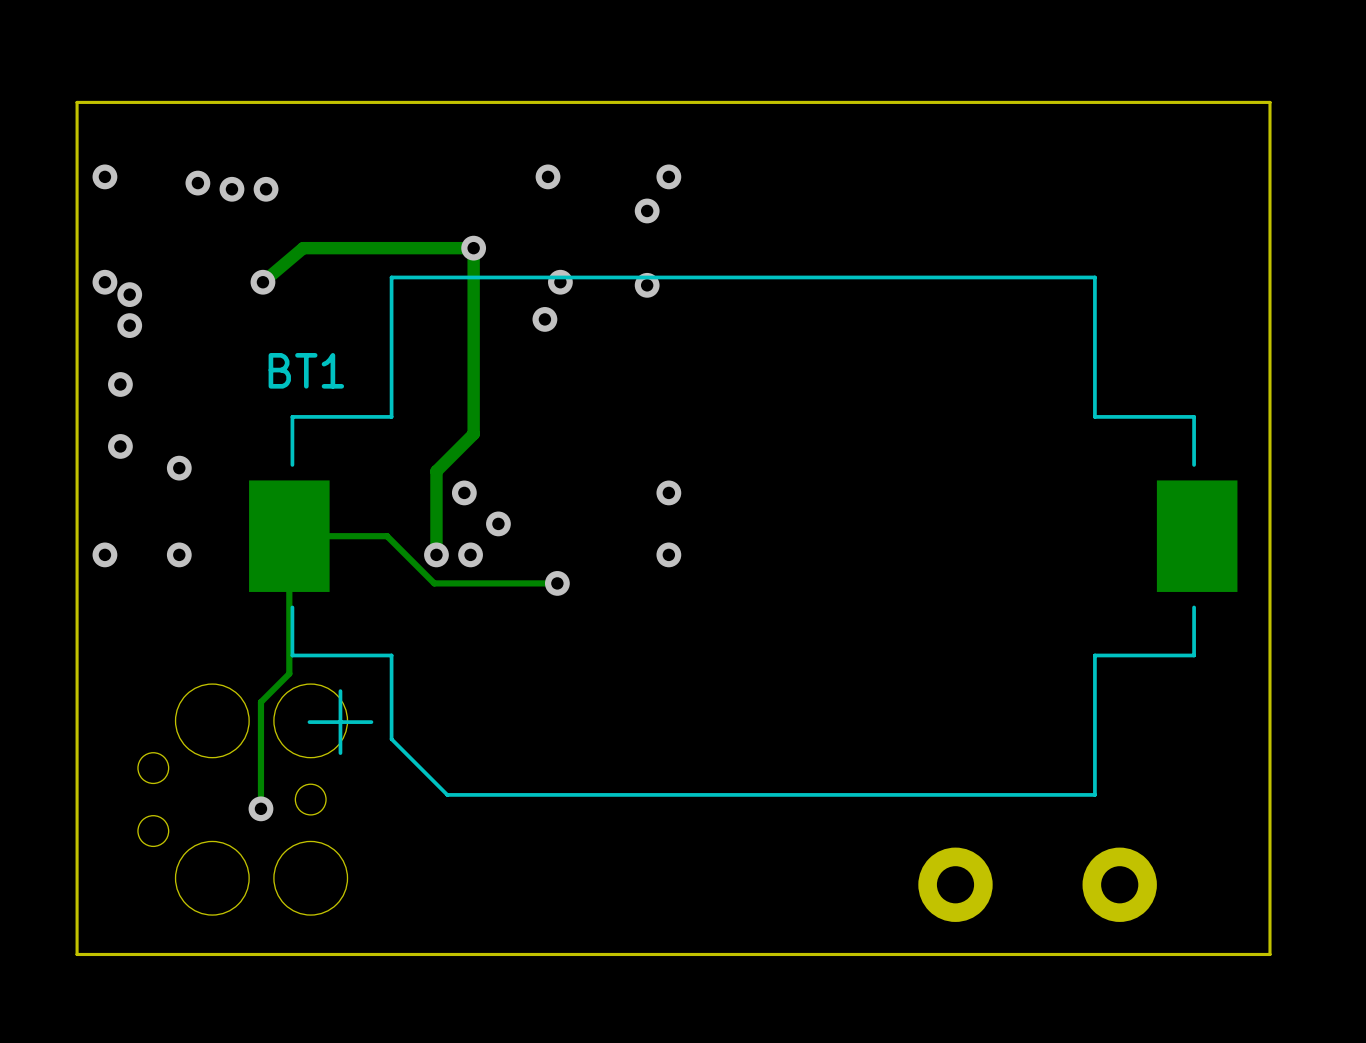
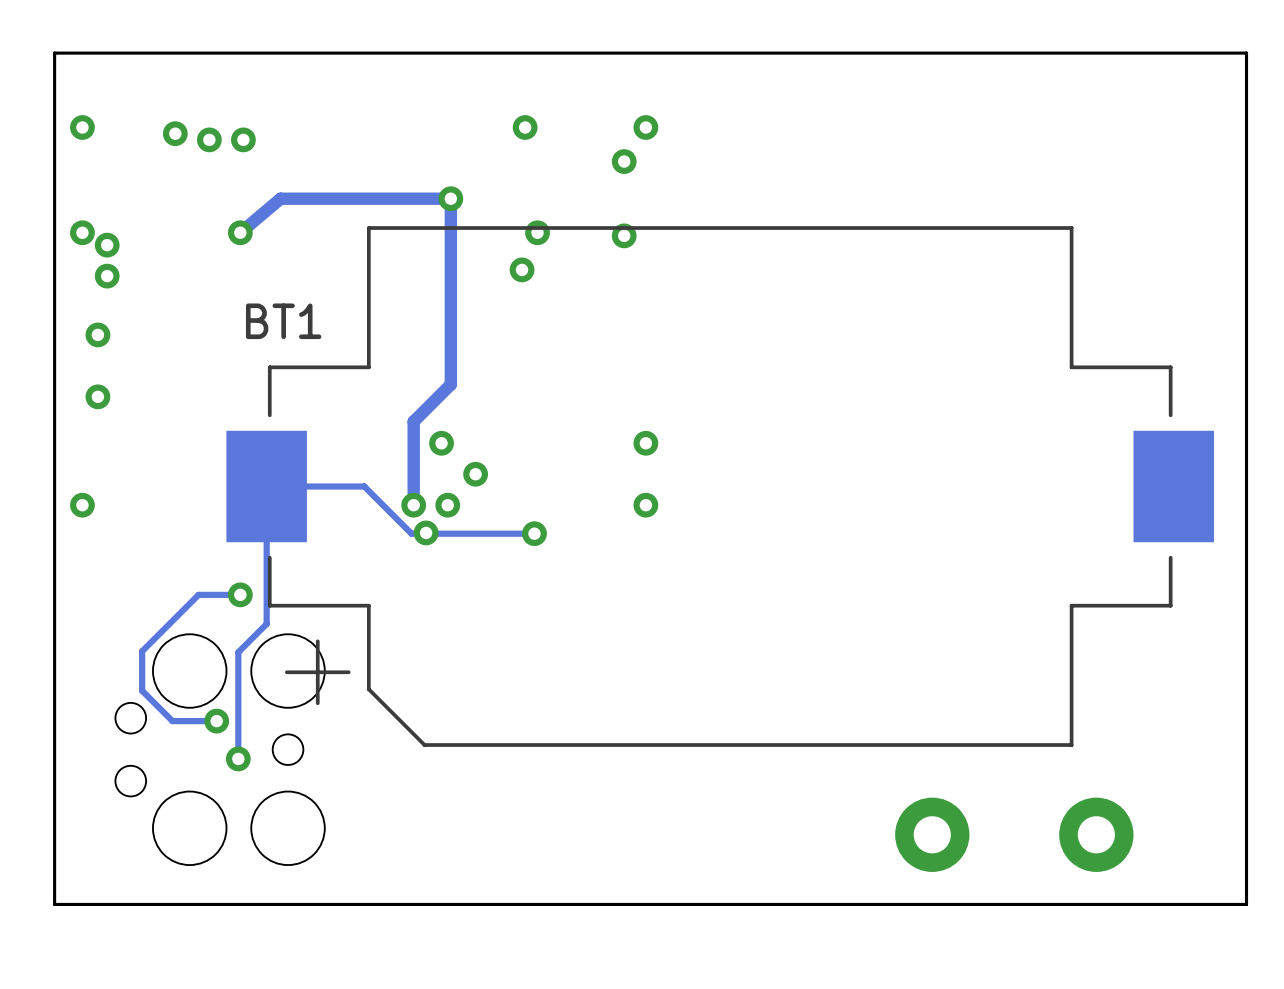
via: (179, 468) -> none
via: (179, 554) -> none
via: none -> (426, 532)
track: none -> (240, 594) (198, 594) (142, 651) (142, 690) (172, 721) (216, 721)
via: none -> (240, 594)
via: none -> (216, 721)

